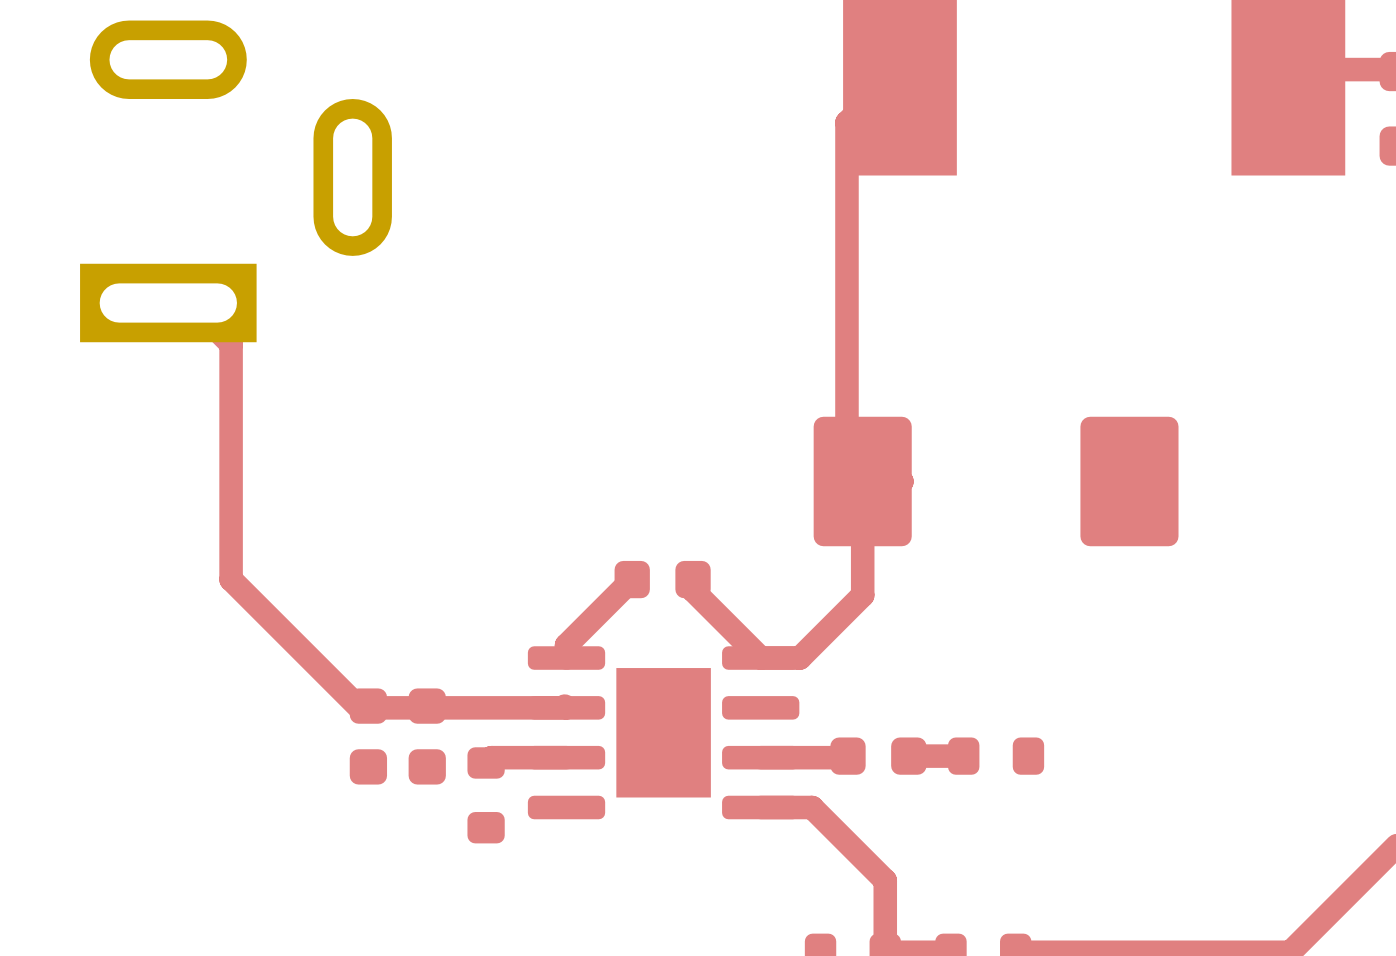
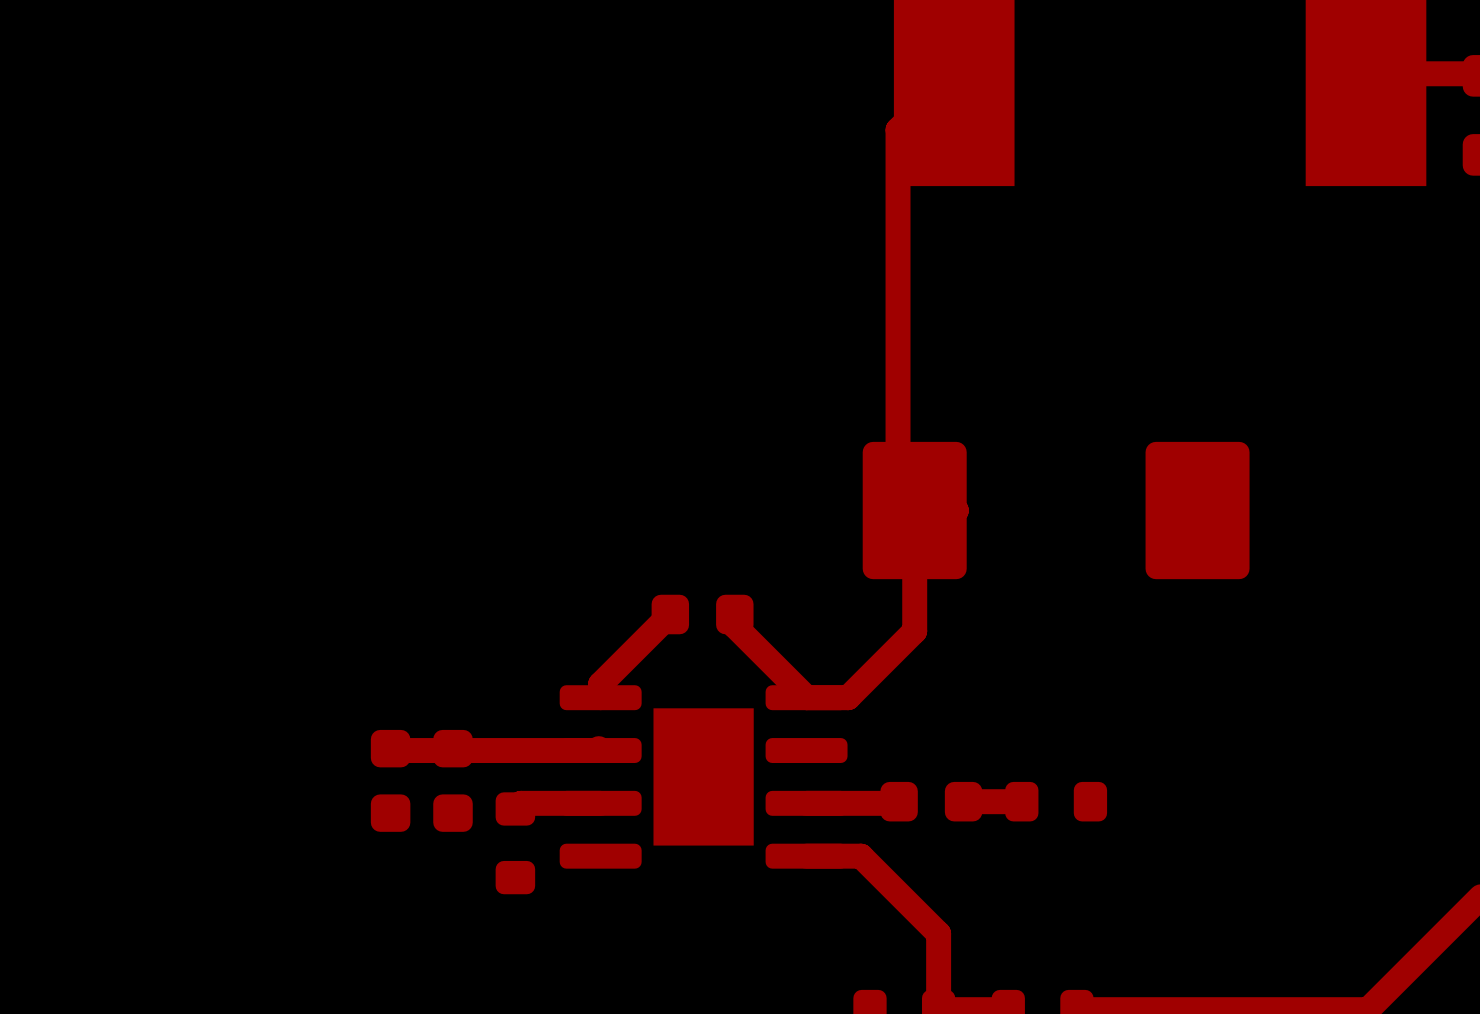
part: (236, 181) -> none
top track: (189, 324) (168, 303) (189, 303) (231, 344) (231, 579) (357, 706) (368, 706) -> none

